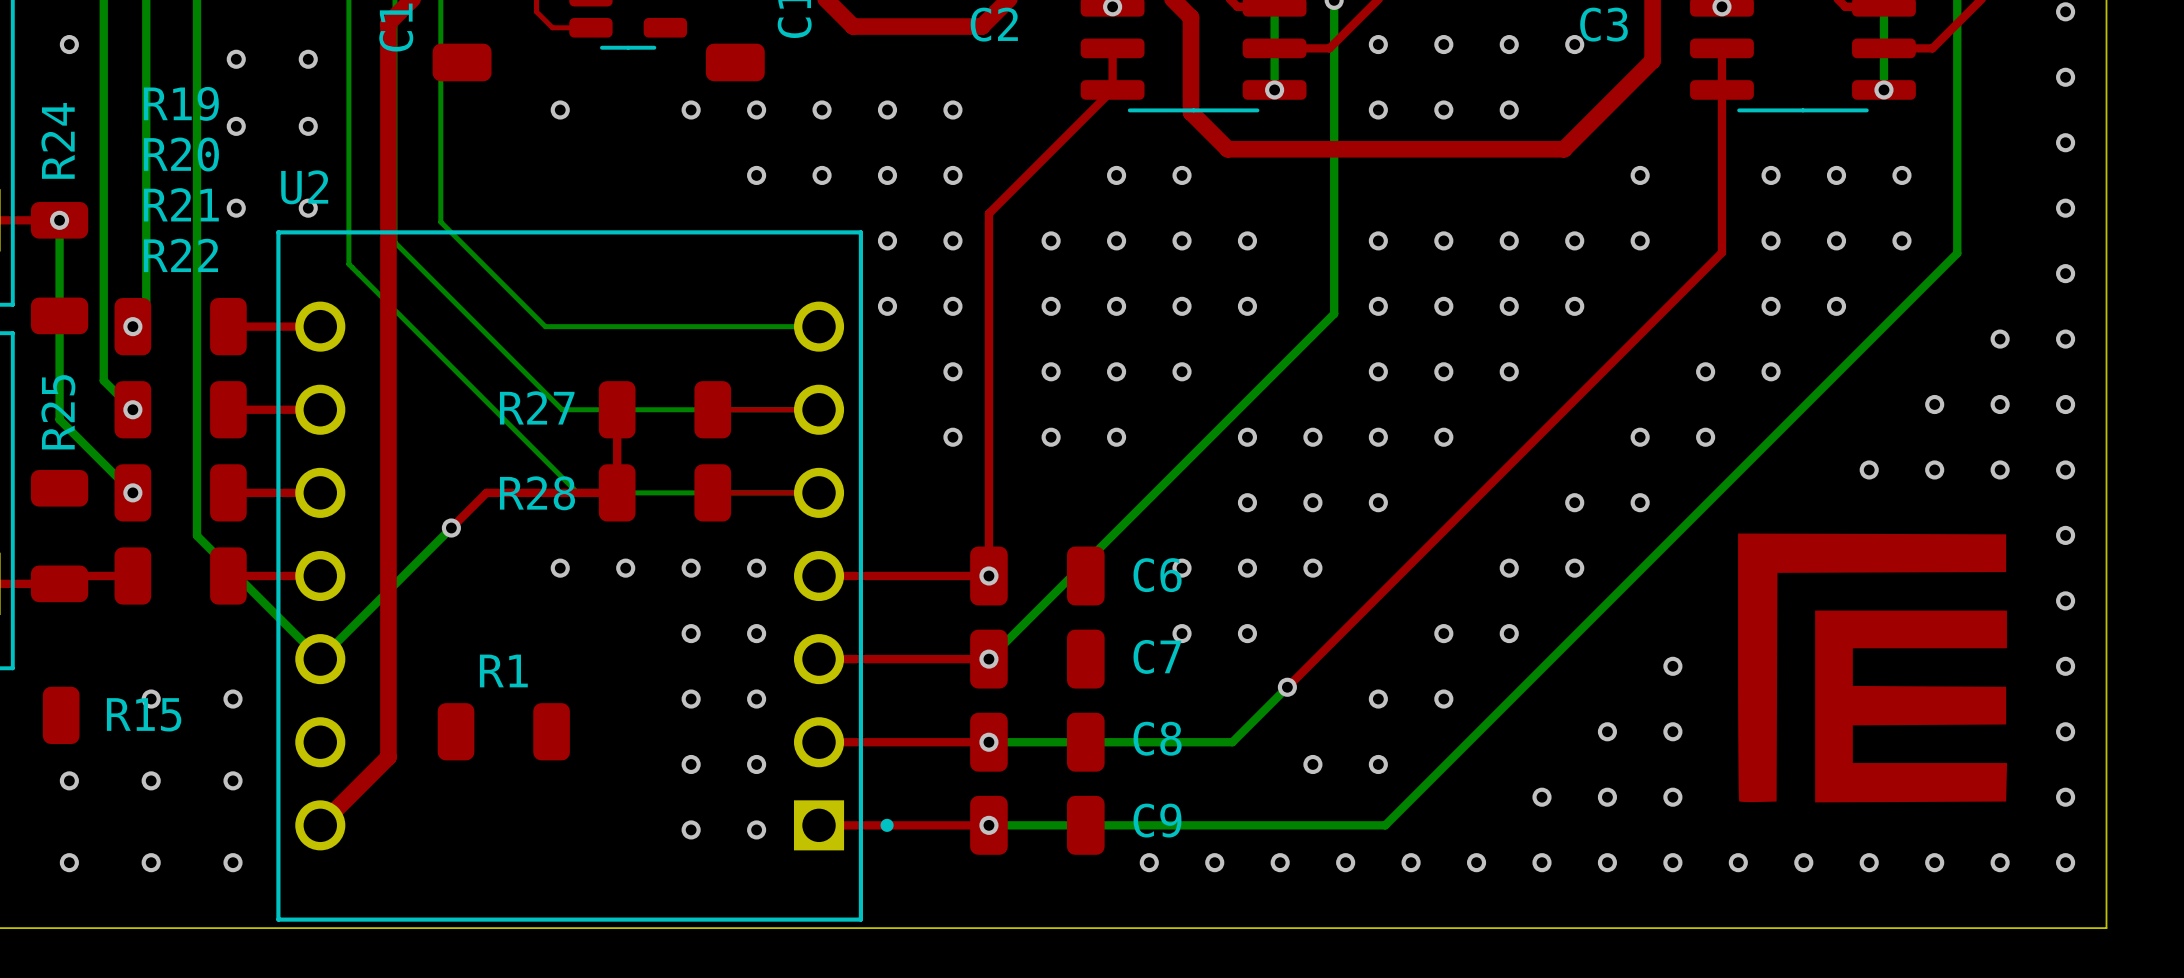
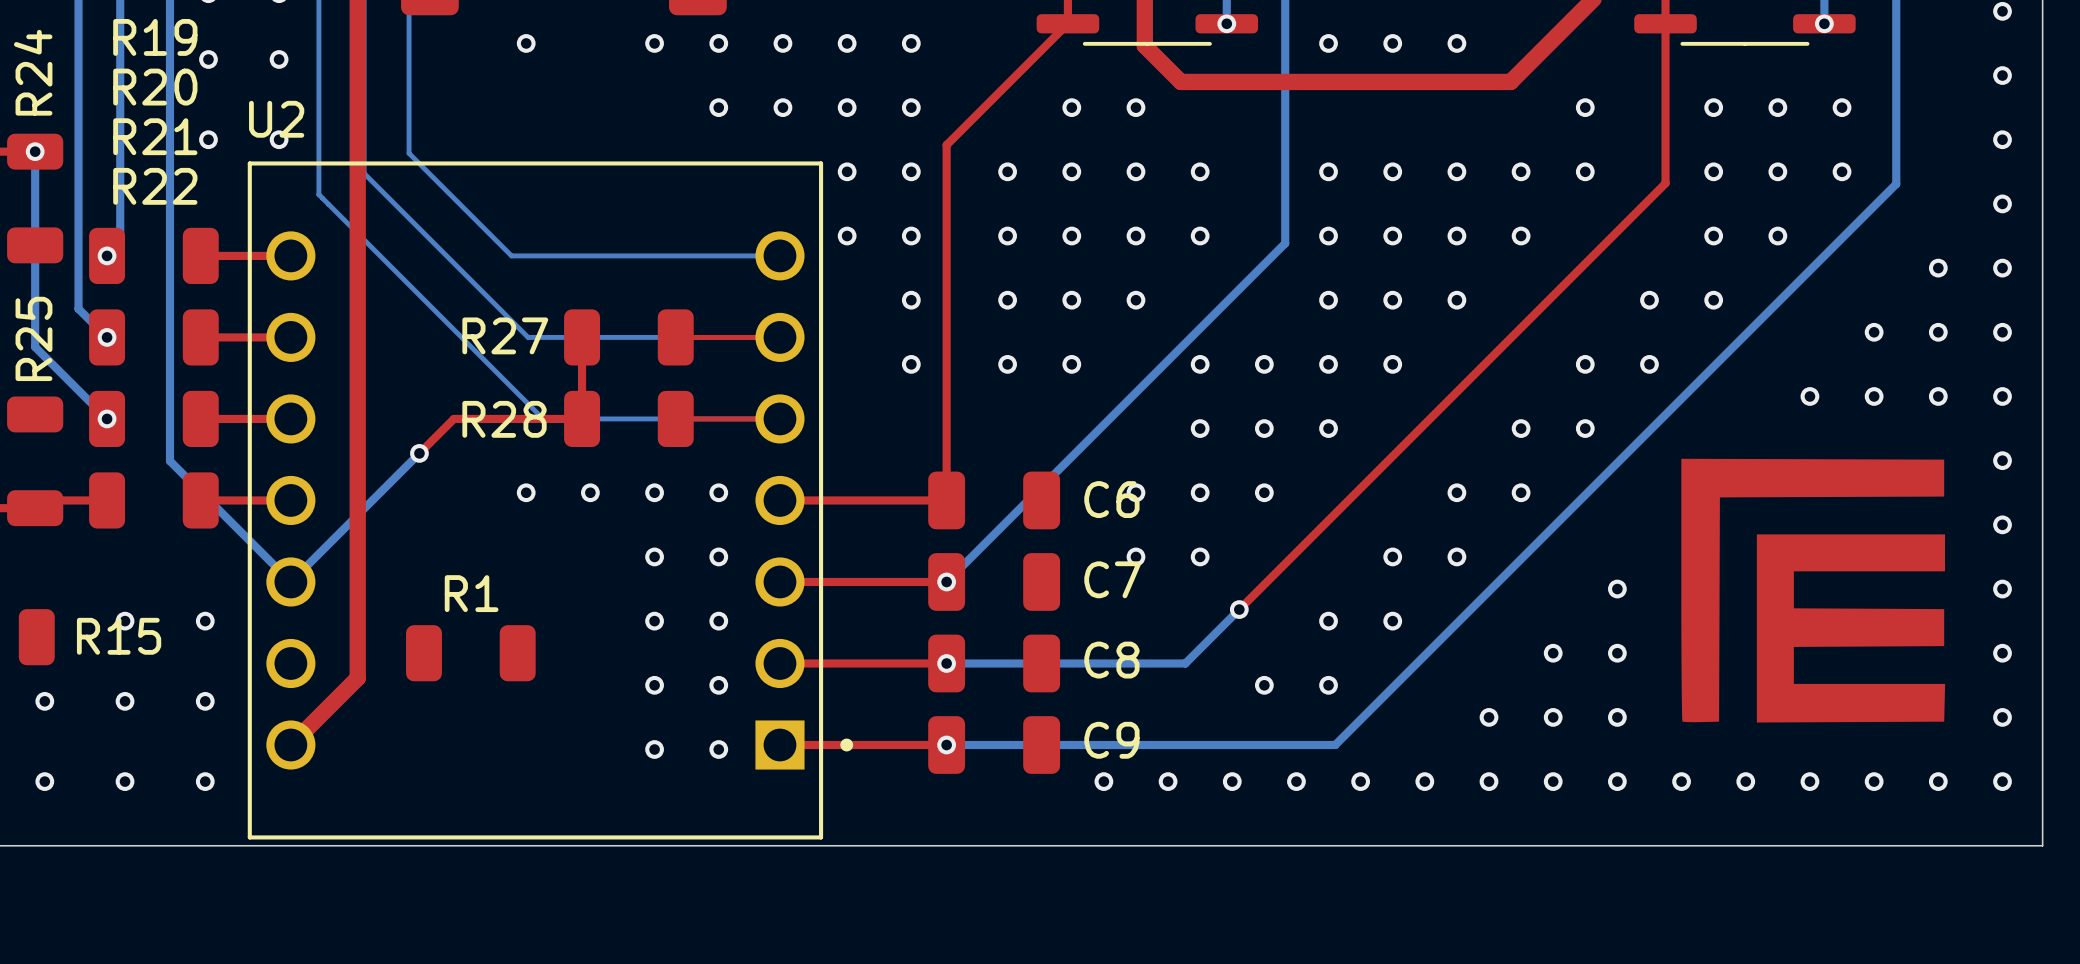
via: (988, 575) -> none

